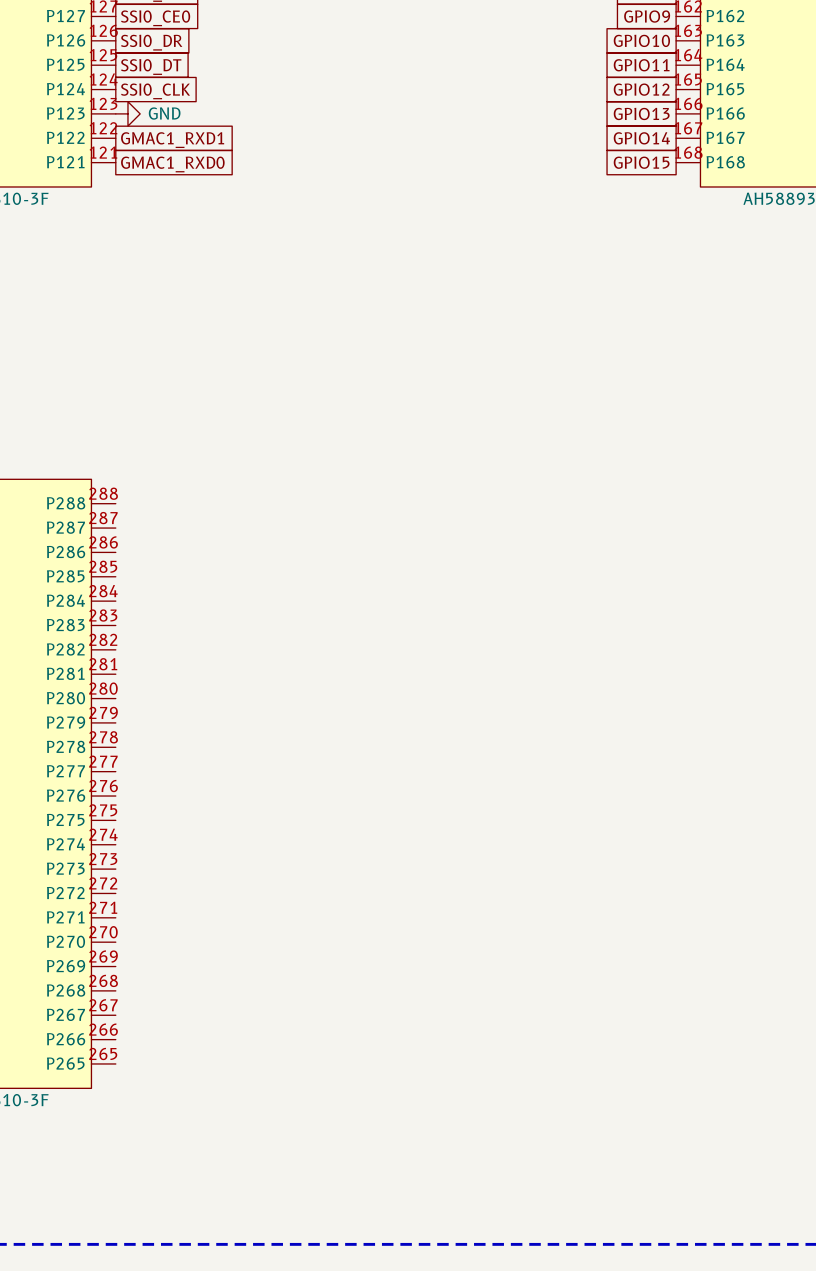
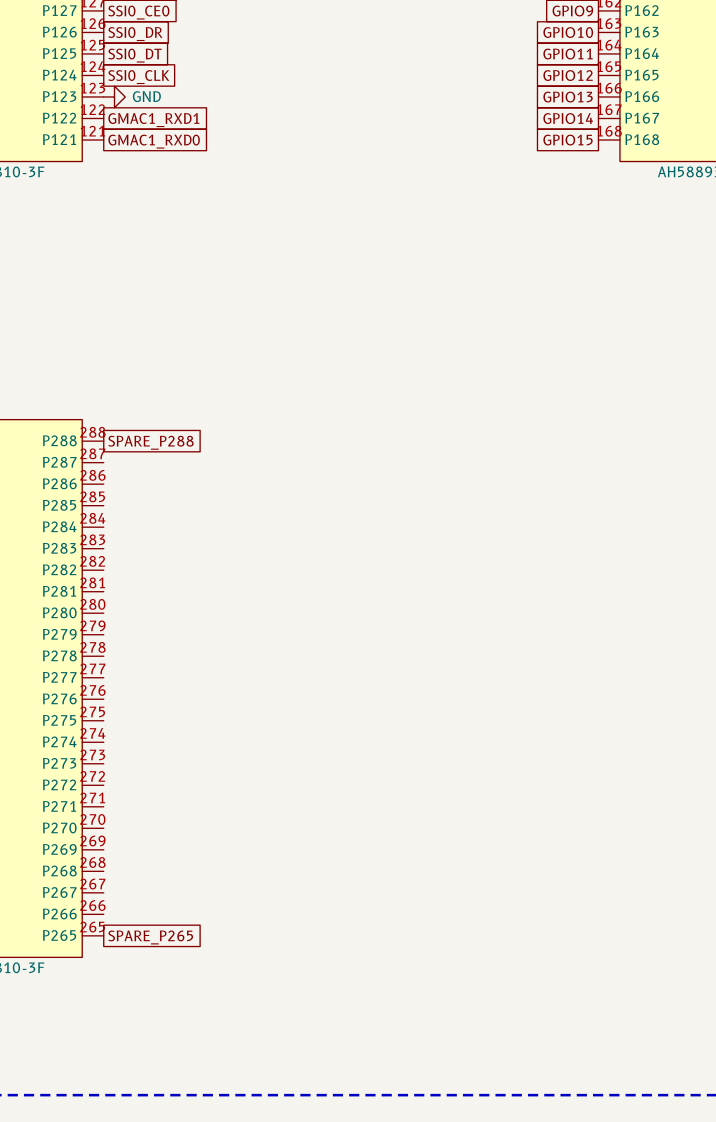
global label: none -> SPARE_P288 (150, 442)
global label: none -> SPARE_P265 (150, 937)

